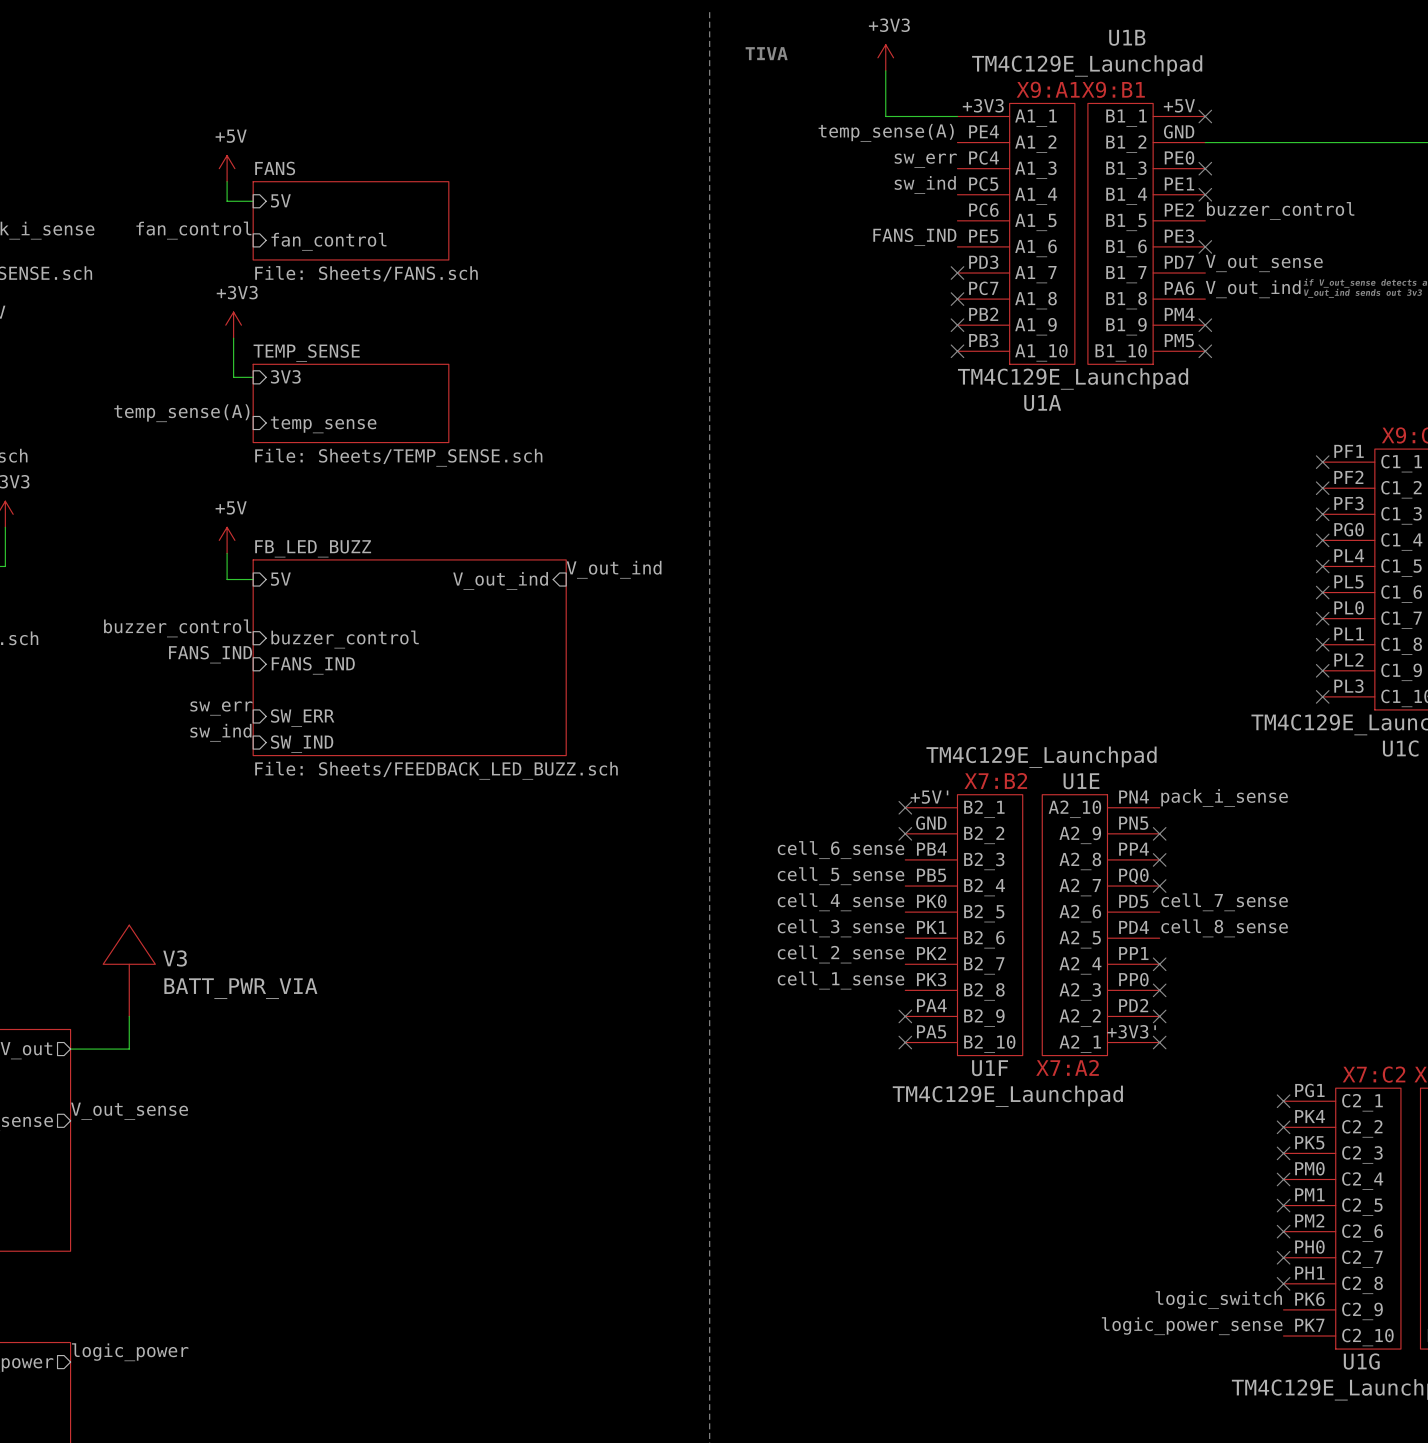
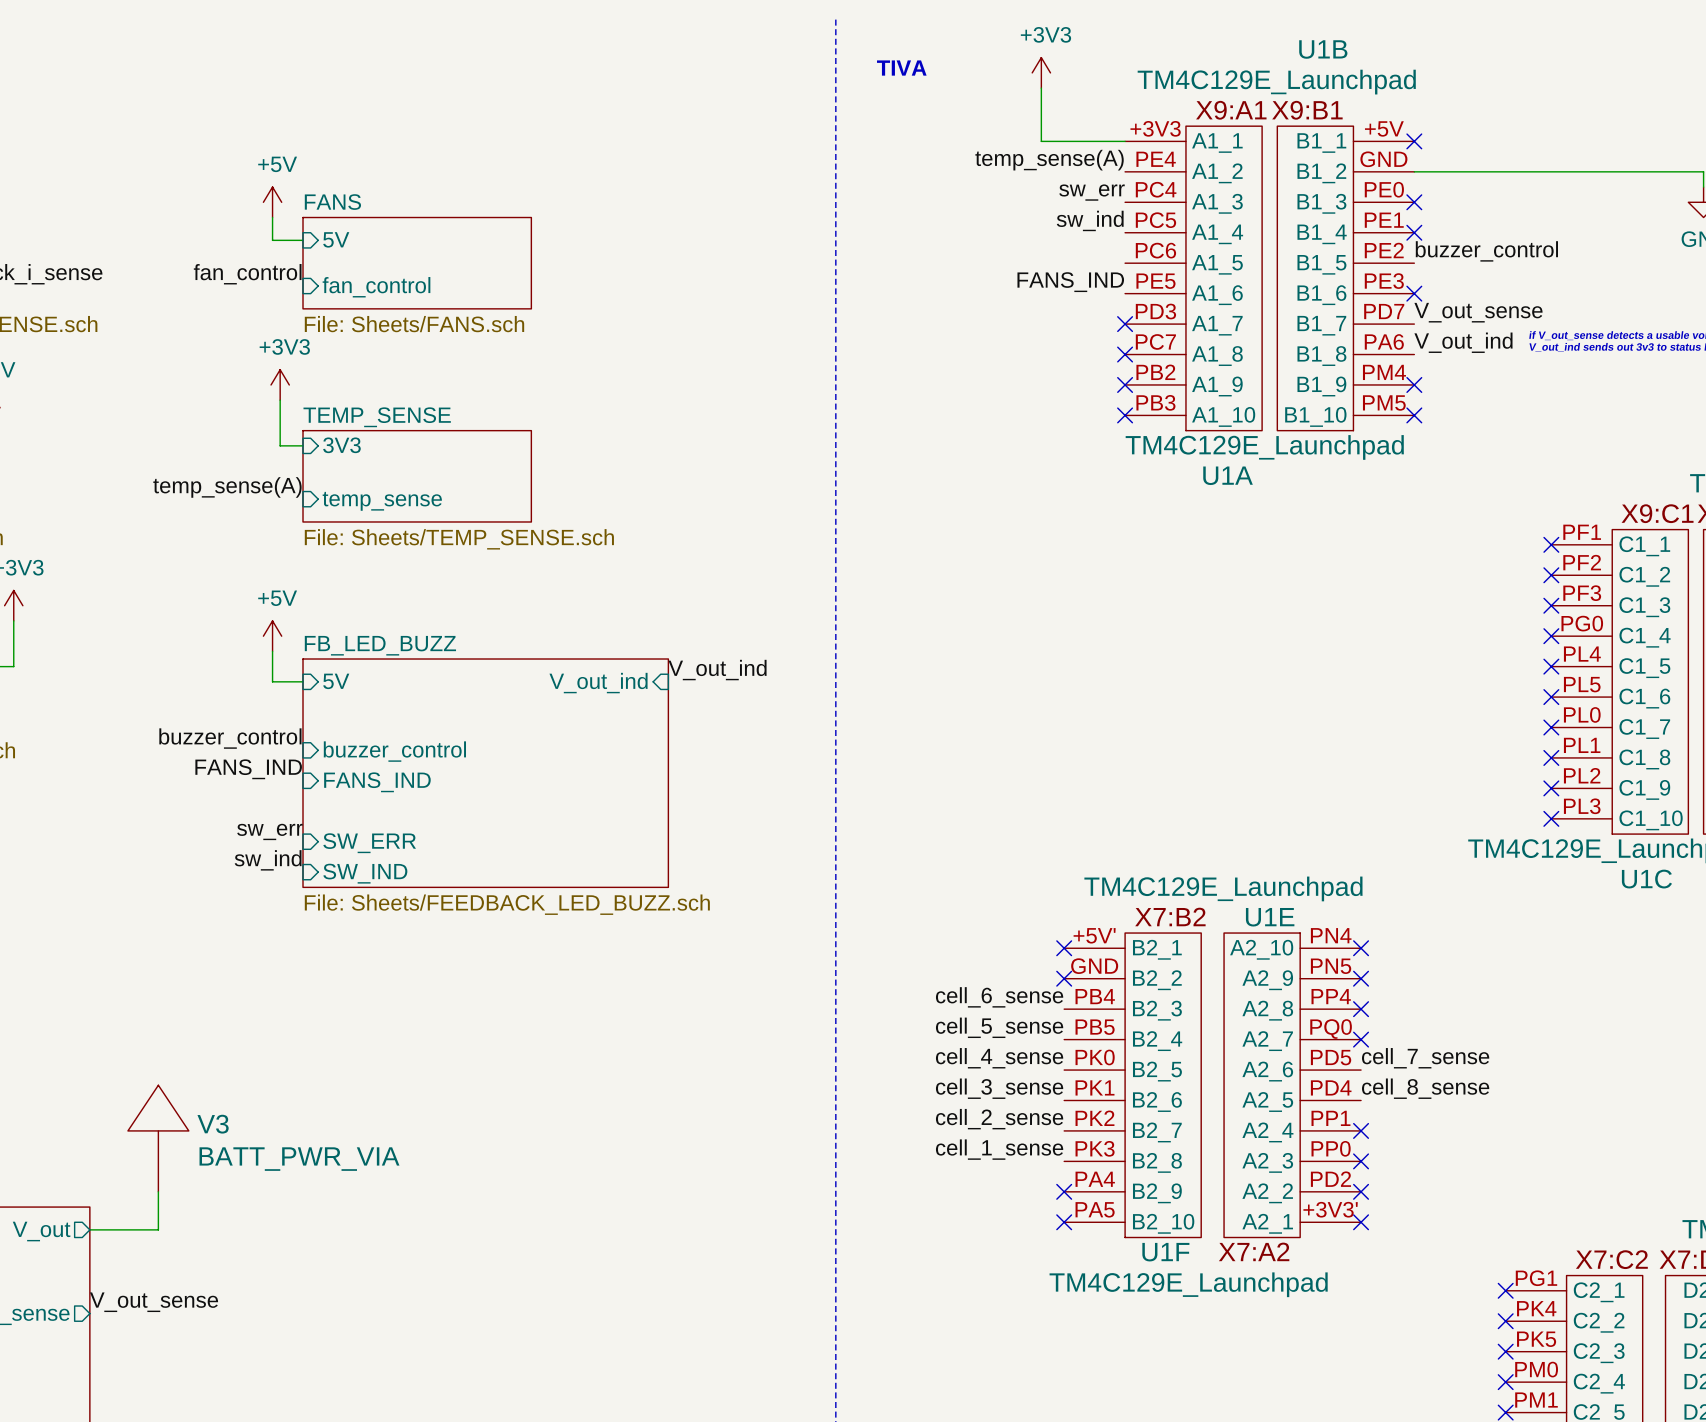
label: pack_i_sense (1224, 797) -> none
no-connect mark: none -> (1361, 948)

